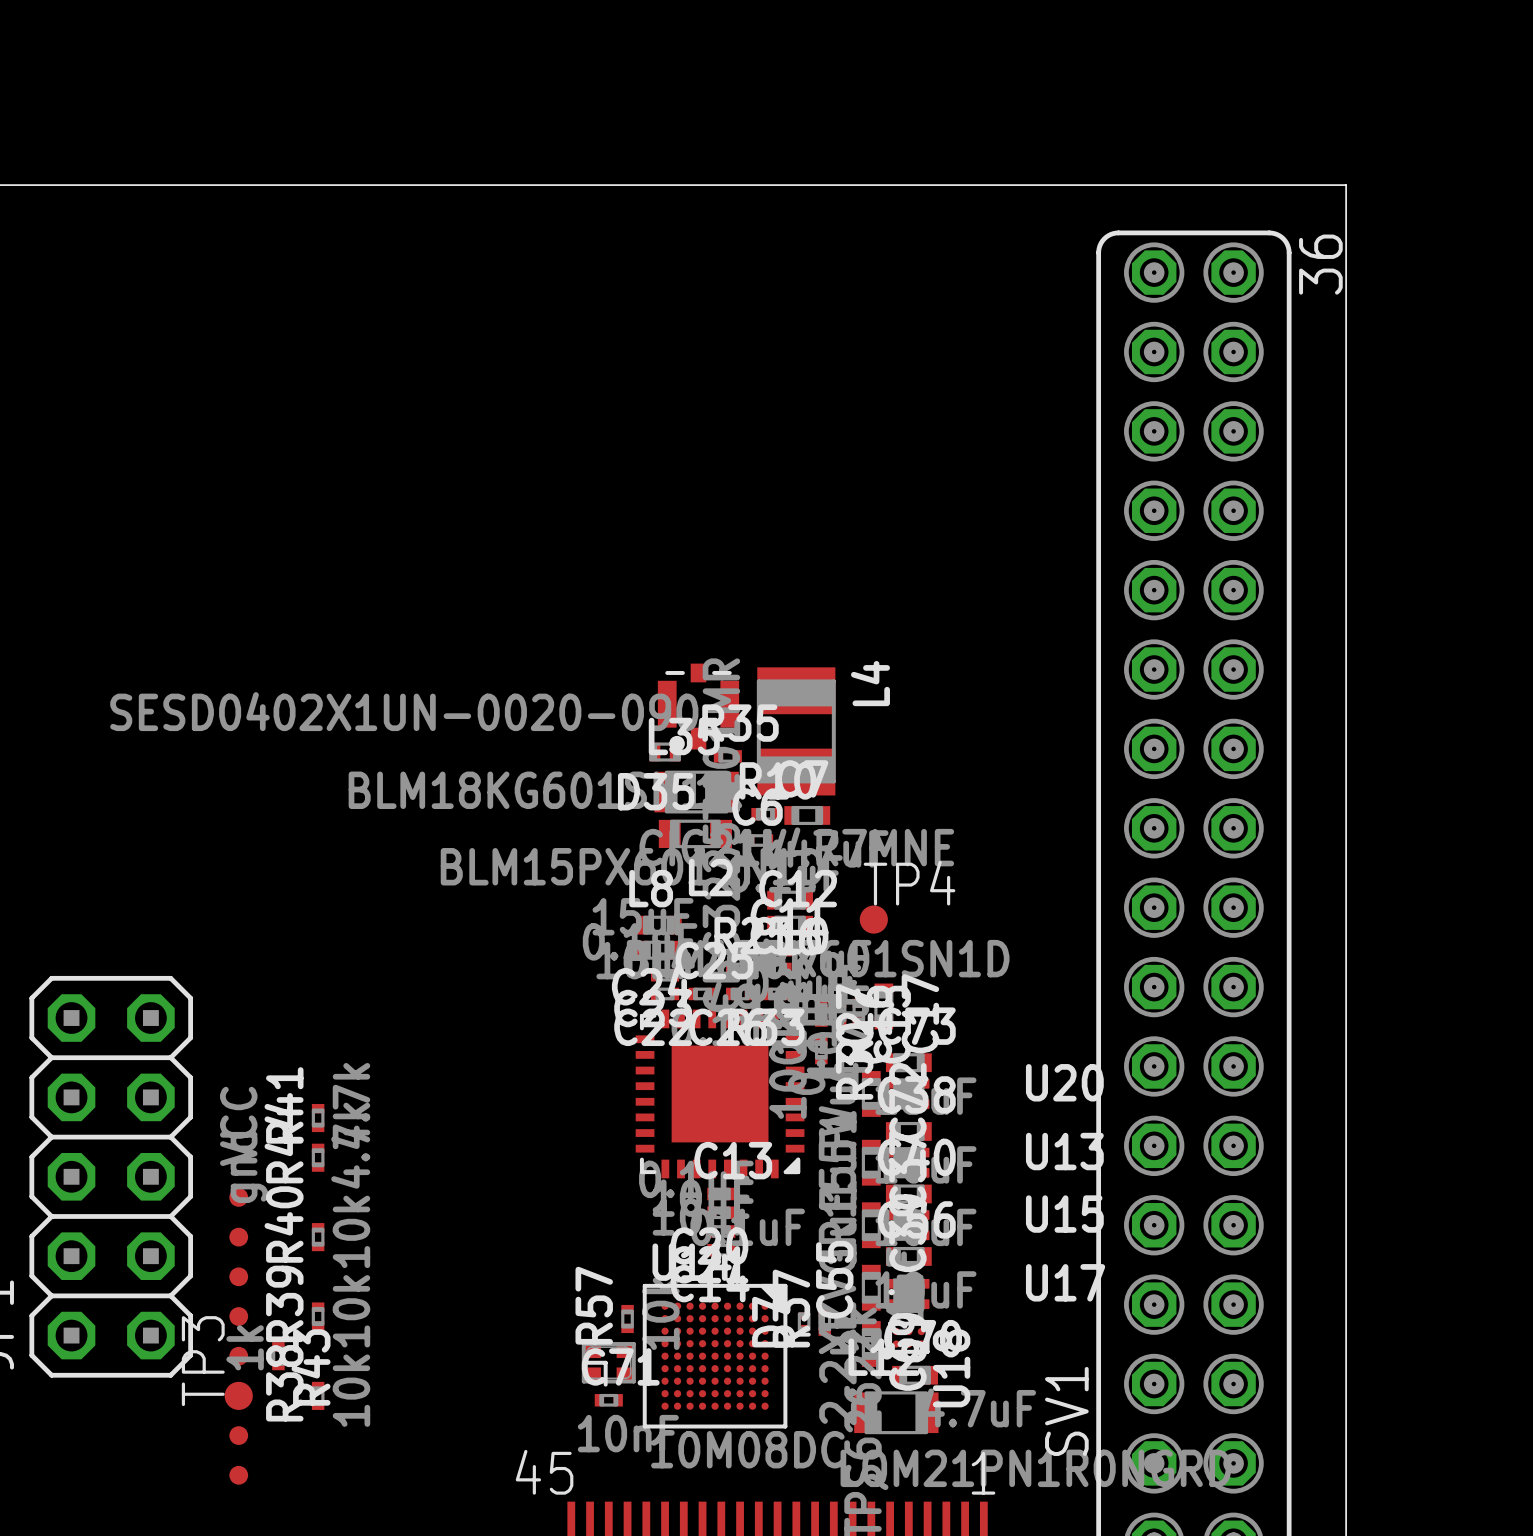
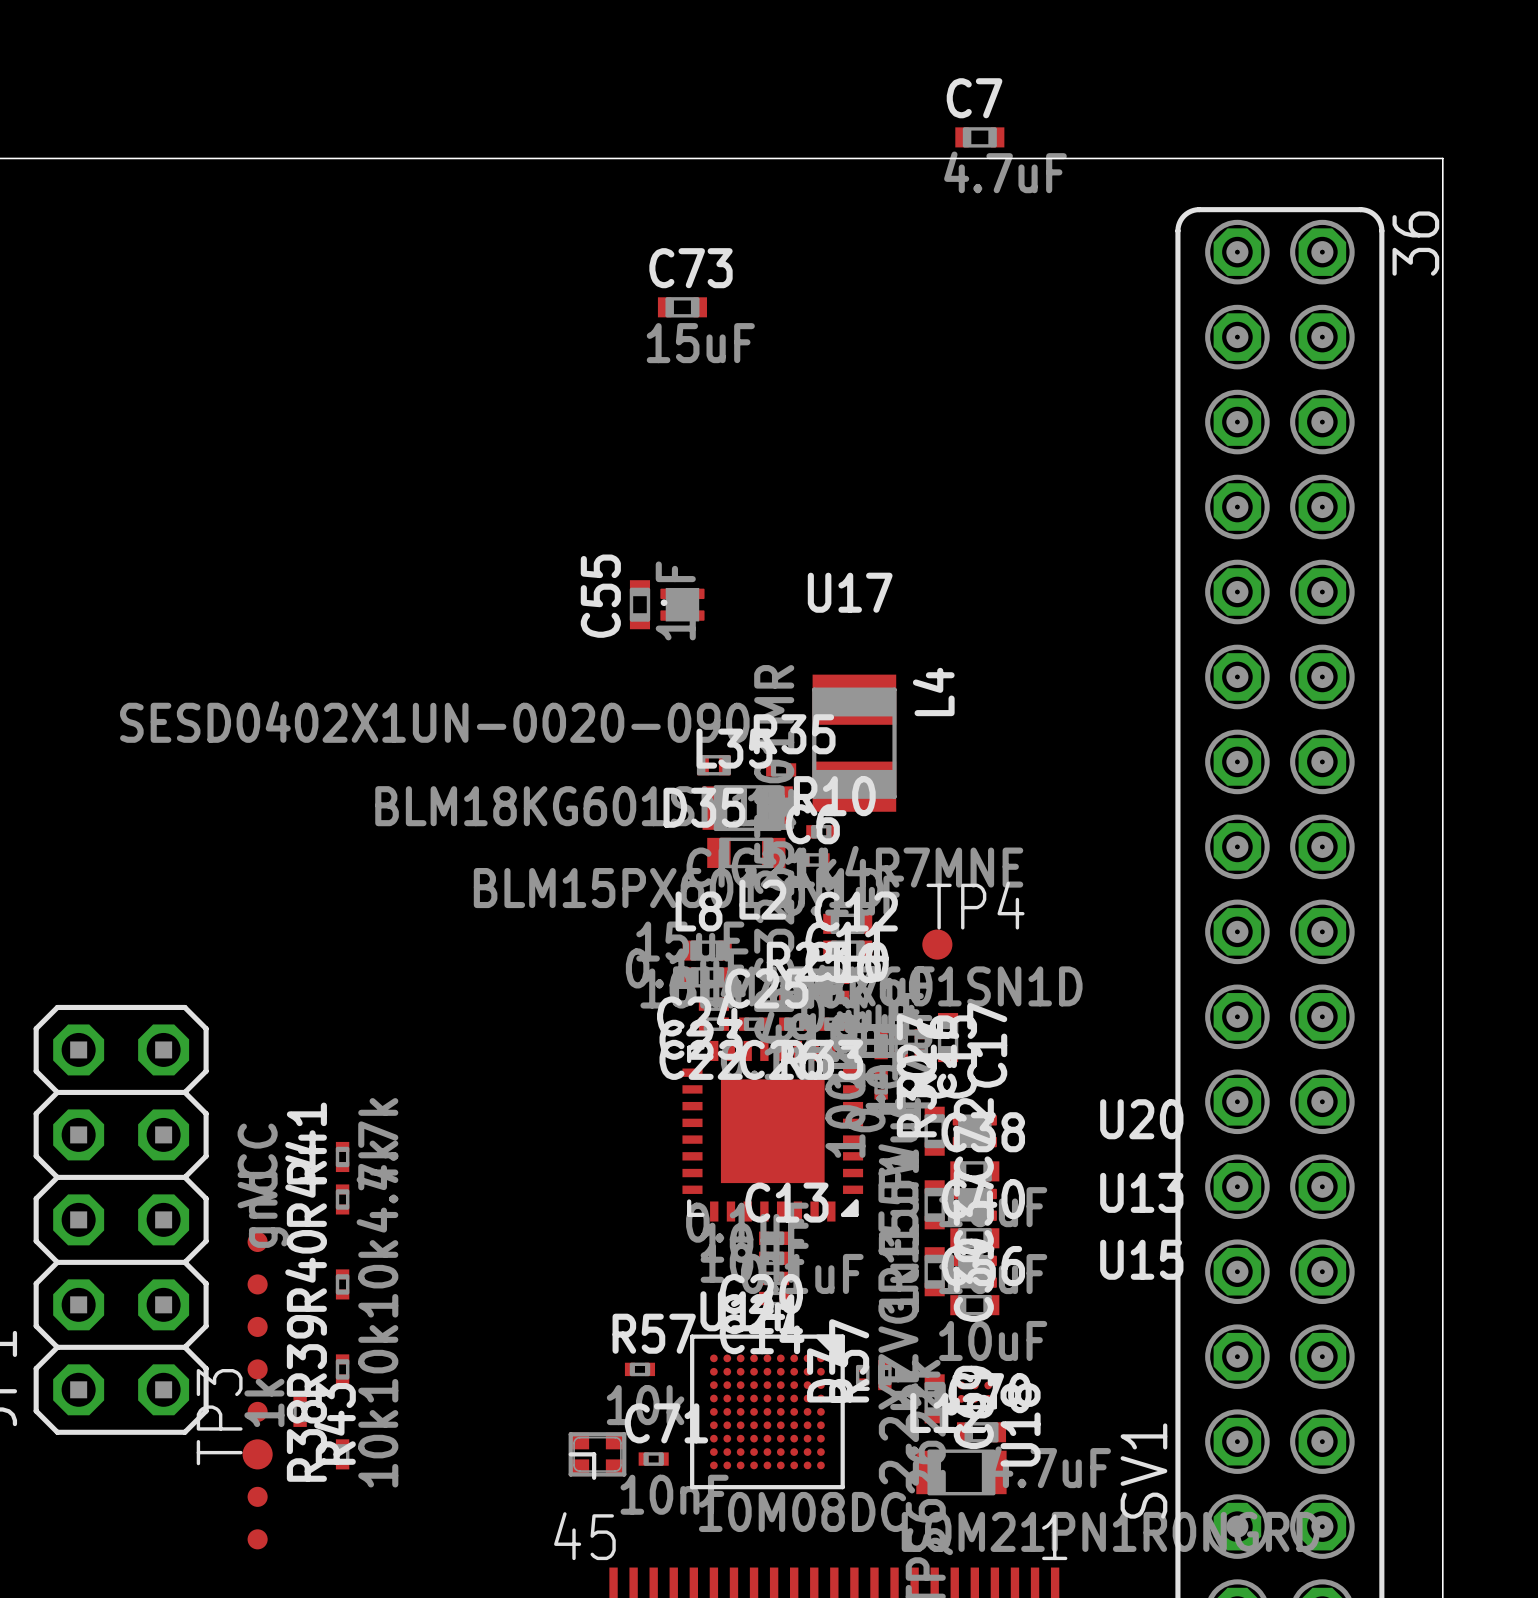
part: (698, 707) -> none
C7 position: (807, 815) -> (979, 137)
C73 position: (908, 1062) -> (682, 307)
C55 position: (871, 1287) -> (639, 604)
U17 position: (908, 1294) -> (682, 604)
R57 rotation: 0° (627, 1319) -> 90° clockwise (639, 1369)
R57 position: (627, 1319) -> (639, 1369)
part position: (608, 1364) -> (597, 1456)

